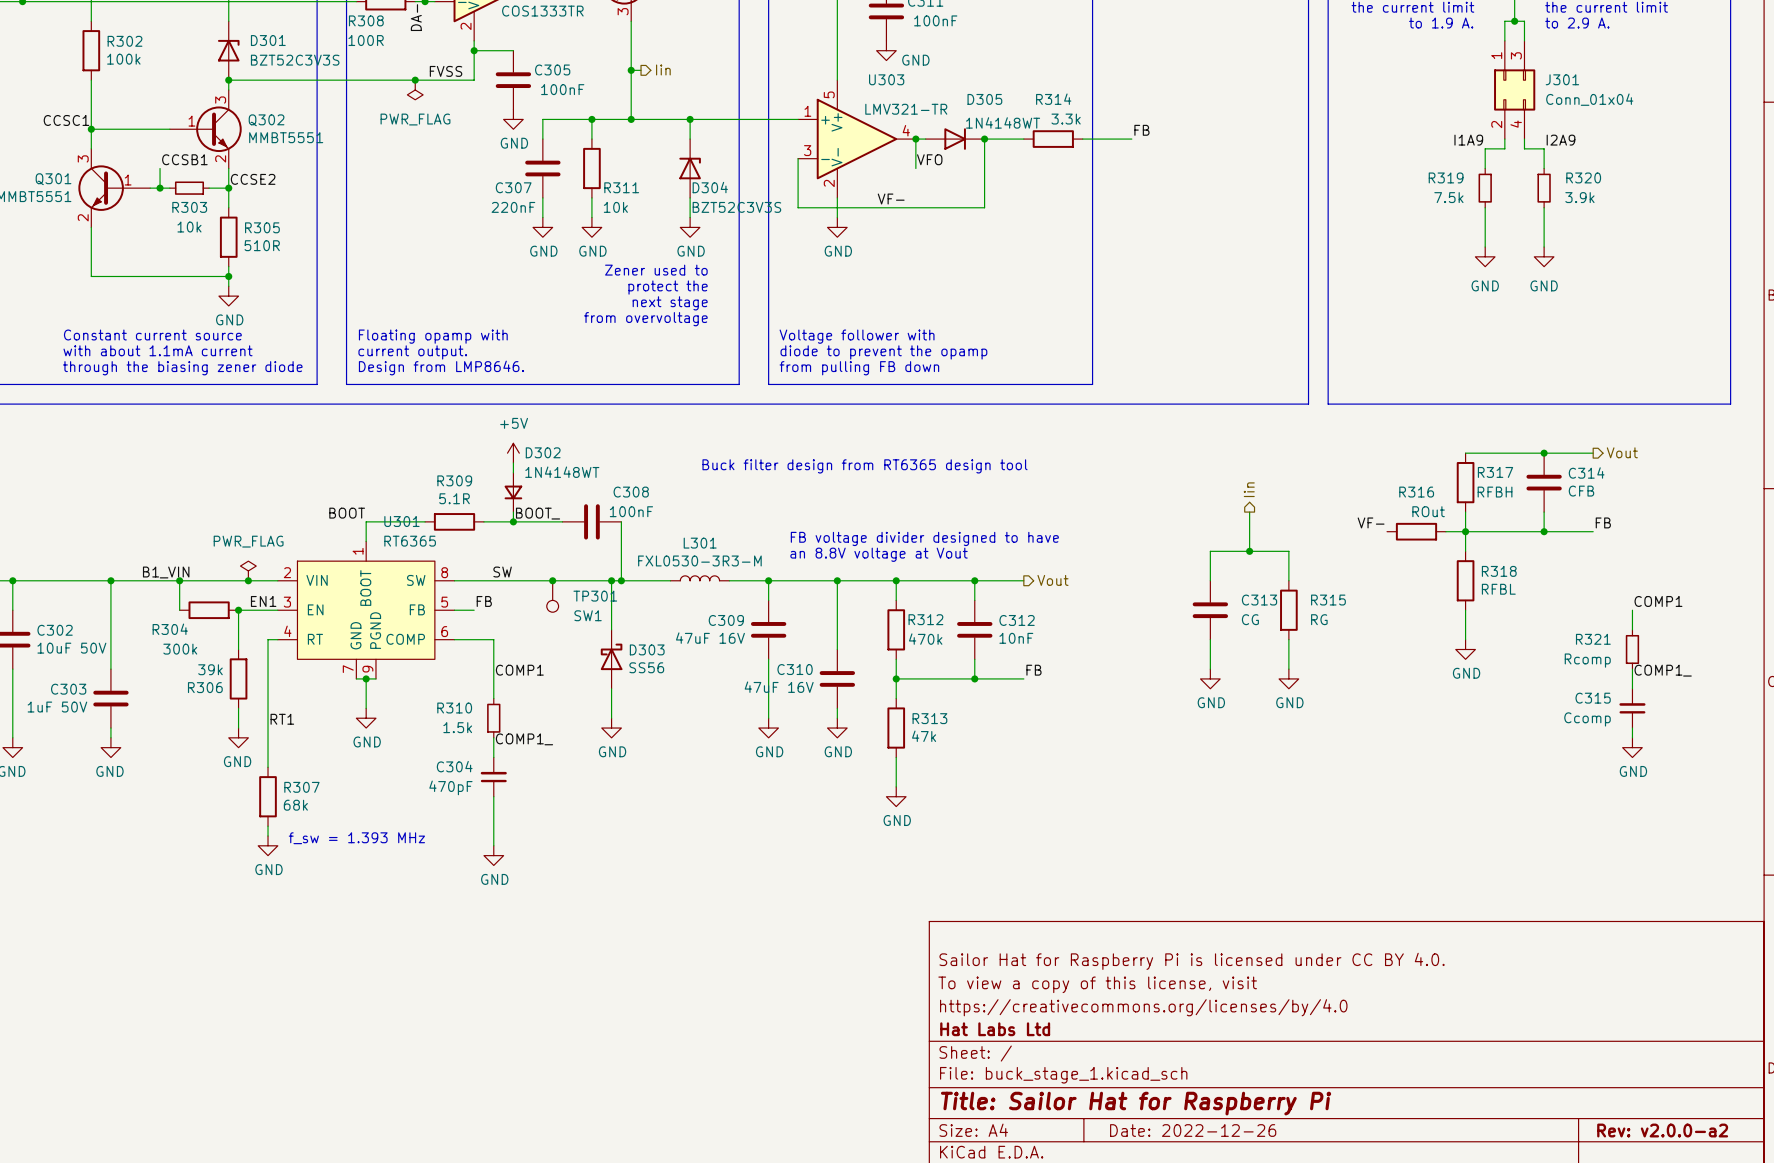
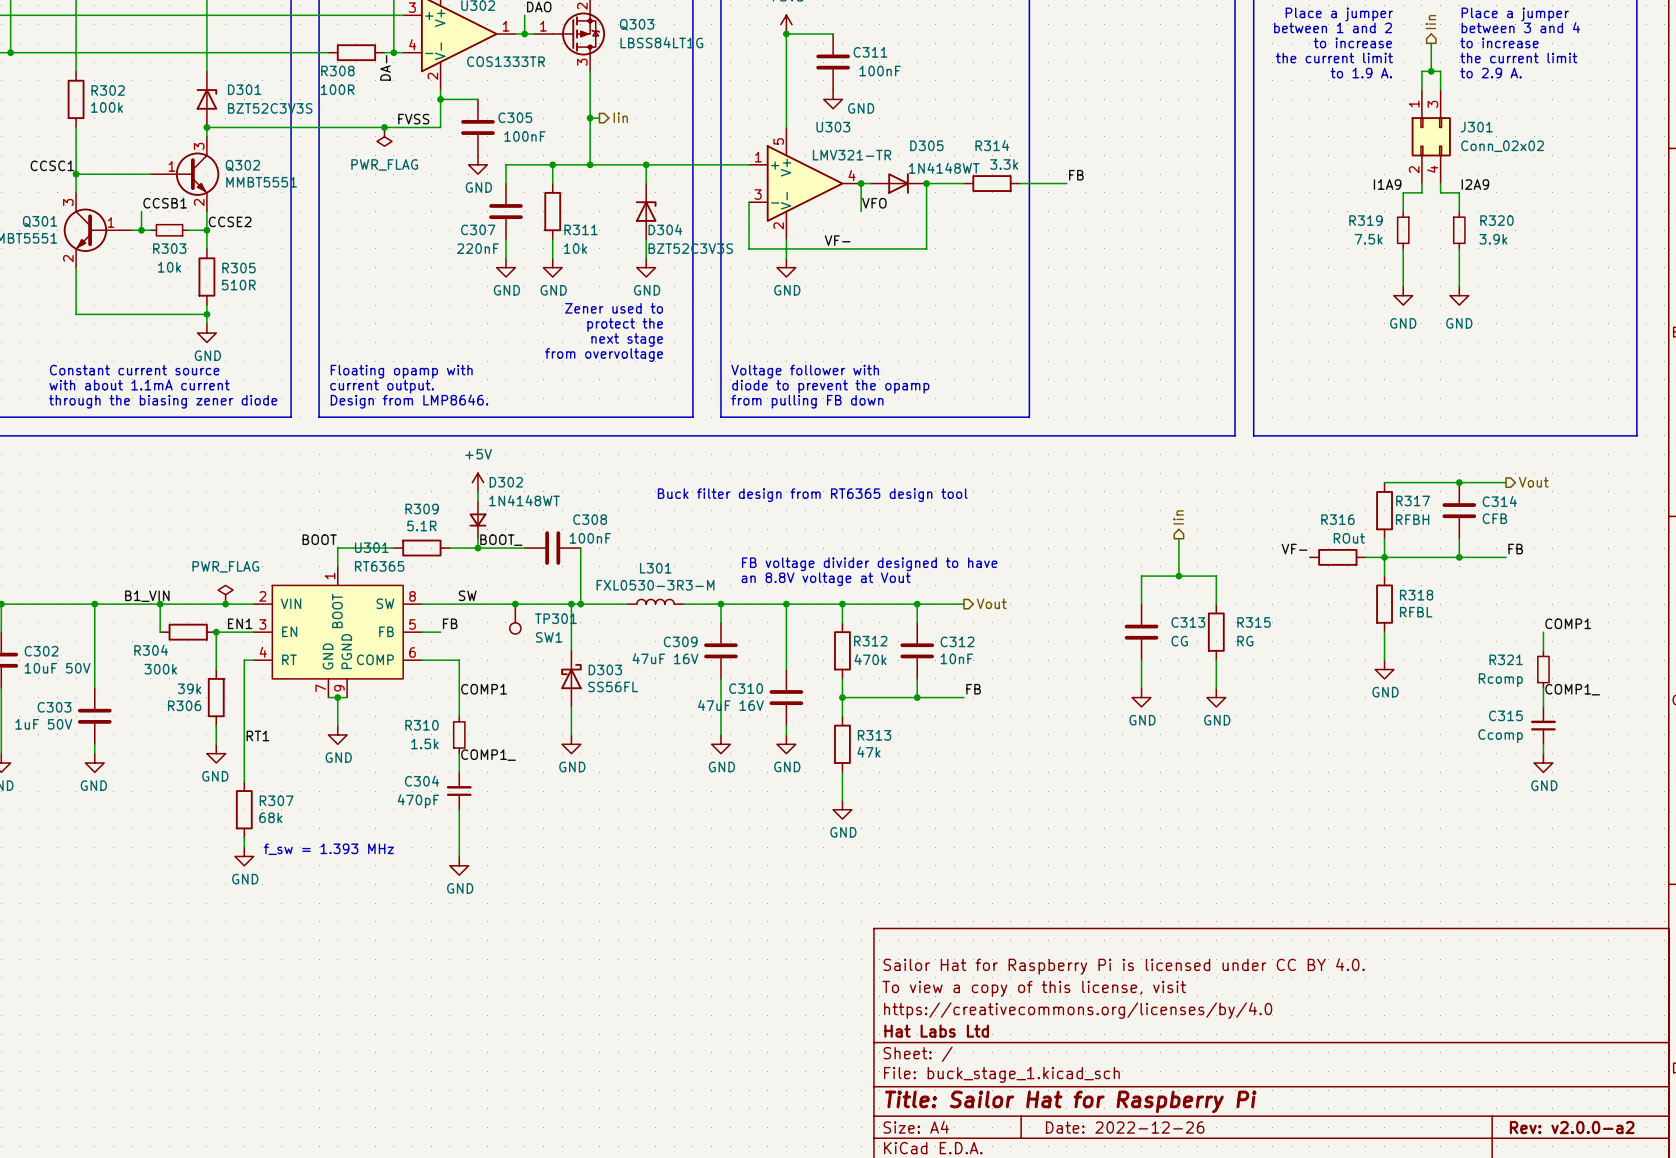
J301 value: Conn_01x04 (1589, 99) -> Conn_02x02 (1502, 146)
D303 value: SS56 (646, 667) -> SS56FL (613, 686)

